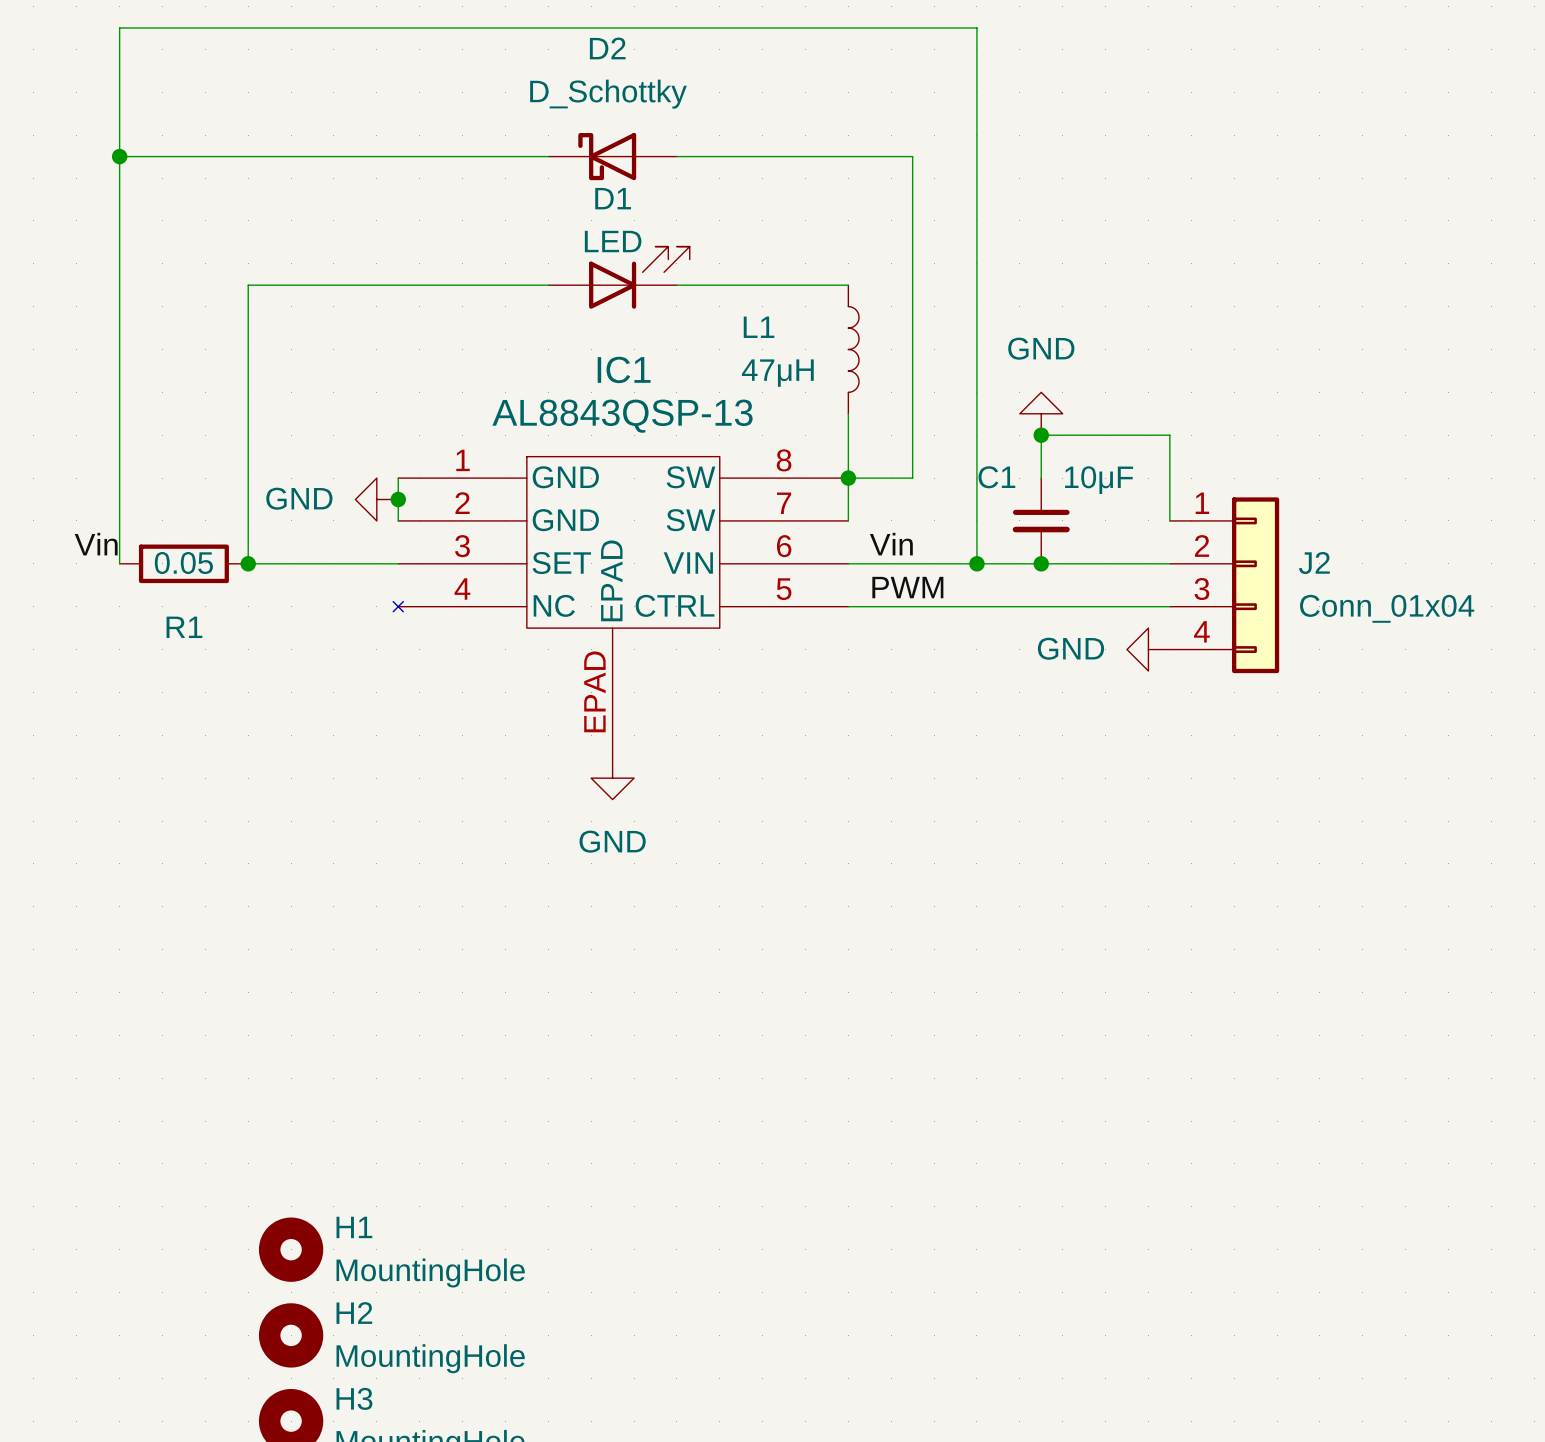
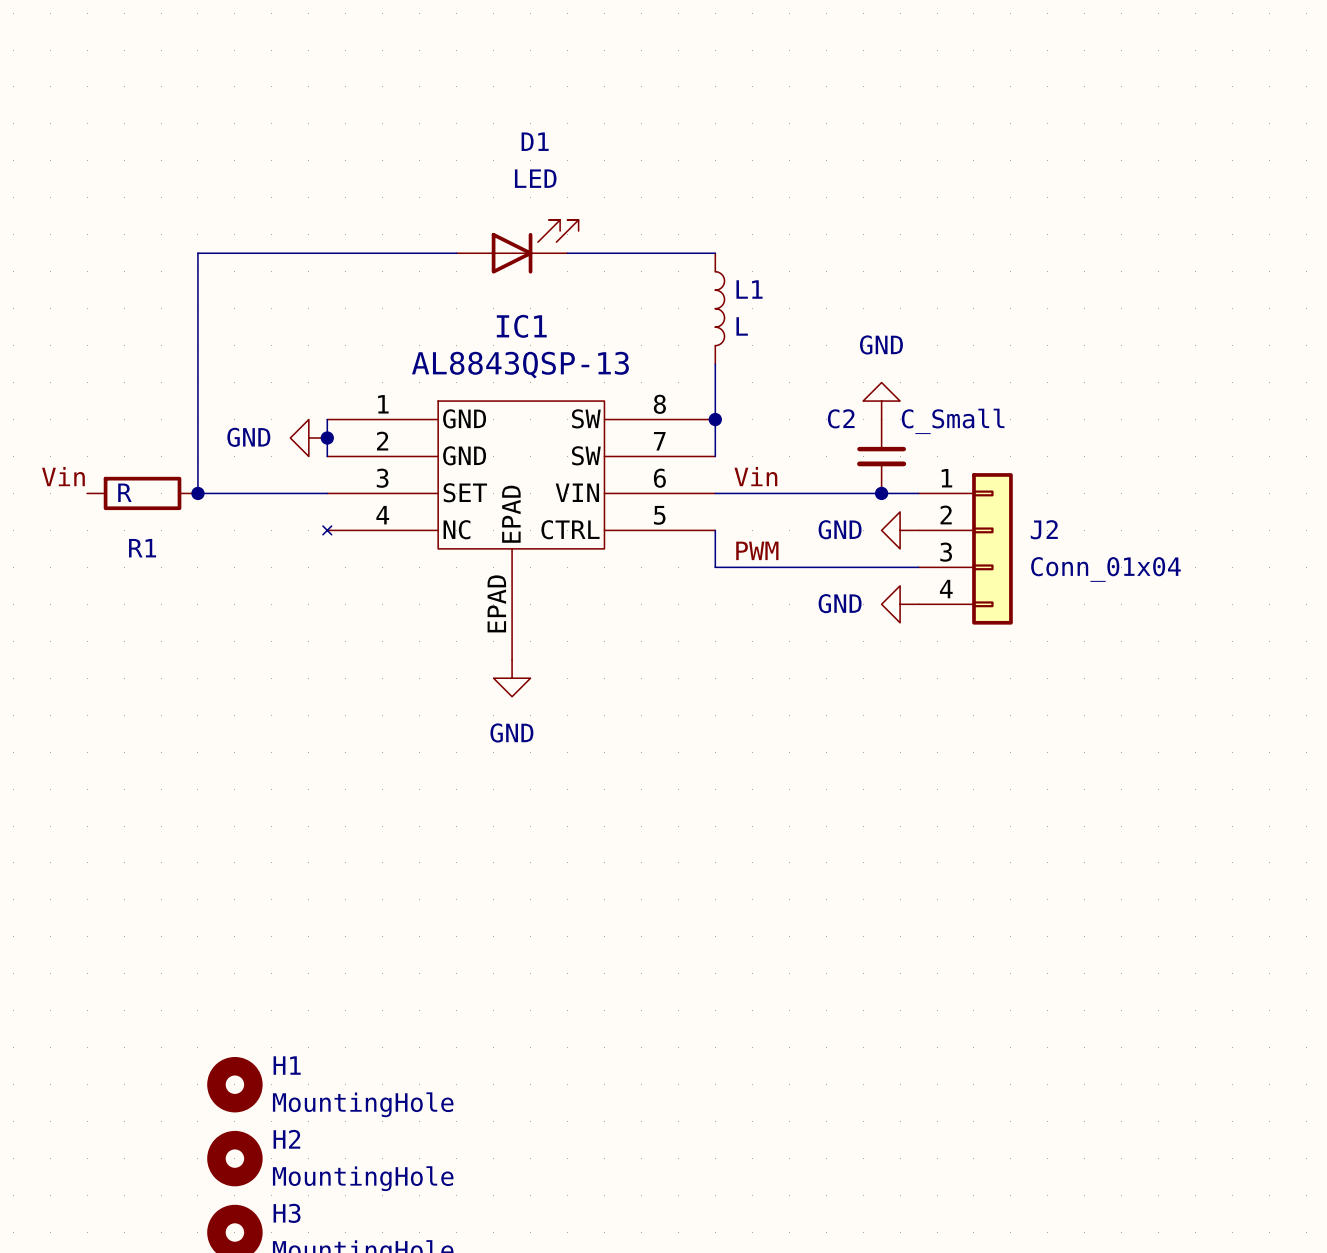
wire: (119, 156) (548, 156) -> none
junction: (119, 156) -> none
D2: D_Schottky (612, 156) -> none
wire: (676, 156) (912, 156) (912, 478) (848, 478) -> none
D1 name position: D1 (613, 198) -> D1 (535, 141)
D1 value position: LED (613, 241) -> LED (535, 178)
L1 name position: L1 (759, 327) -> L1 (749, 289)
L1 value: 47μH (777, 373) -> L (742, 326)
power symbol position: GND (1041, 413) -> GND (881, 401)
junction: (1041, 435) -> none
C1 name: C1 (996, 477) -> C2 (841, 418)
wire: (1041, 478) (1041, 435) (1169, 435) (1169, 520) -> none
C1 value: 10μF (1099, 480) -> C_Small (953, 421)
wire: (119, 563) (119, 27) (976, 27) (976, 563) -> none
R1 value: 0.05 (183, 563) -> R (124, 492)
junction: (976, 563) -> none
J2 position: (1224, 585) -> (965, 548)
label position: PWM (907, 587) -> PWM (757, 550)
wire: (848, 606) (1169, 606) -> (715, 530) (715, 567) (918, 567)
power symbol: none -> GND (900, 530)
power symbol: GND (1148, 649) -> none
power symbol: none -> GND (900, 604)

